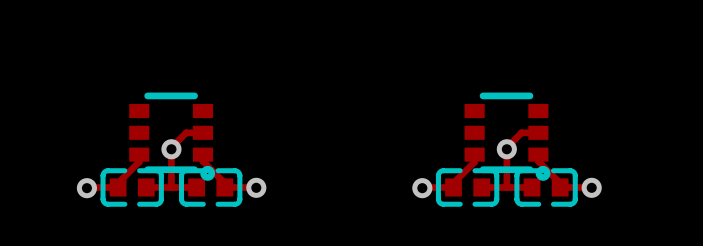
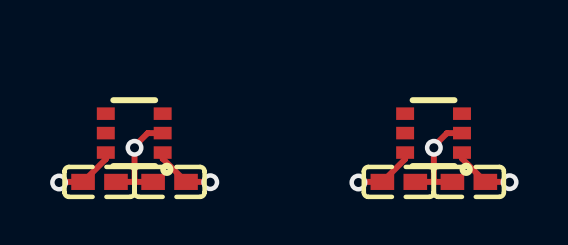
part footprint: [100, 168, 164, 207] -> [62, 164, 137, 200]
part footprint: [179, 168, 243, 207] -> [132, 164, 207, 200]
part footprint: [435, 168, 500, 207] -> [361, 164, 437, 200]
part footprint: [514, 168, 578, 207] -> [431, 164, 507, 200]

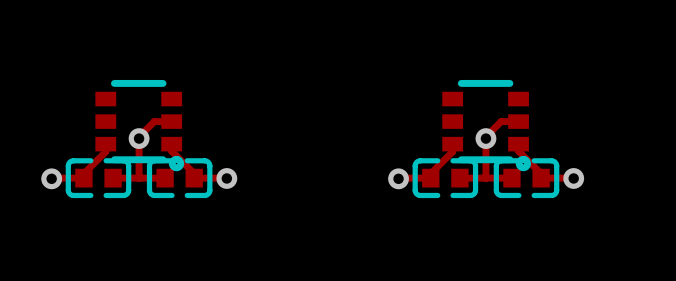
part footprint: [62, 164, 137, 200] -> [65, 158, 132, 199]
part footprint: [132, 164, 207, 200] -> [146, 158, 213, 199]
part footprint: [361, 164, 437, 200] -> [412, 158, 479, 199]
part footprint: [431, 164, 507, 200] -> [493, 158, 560, 199]

